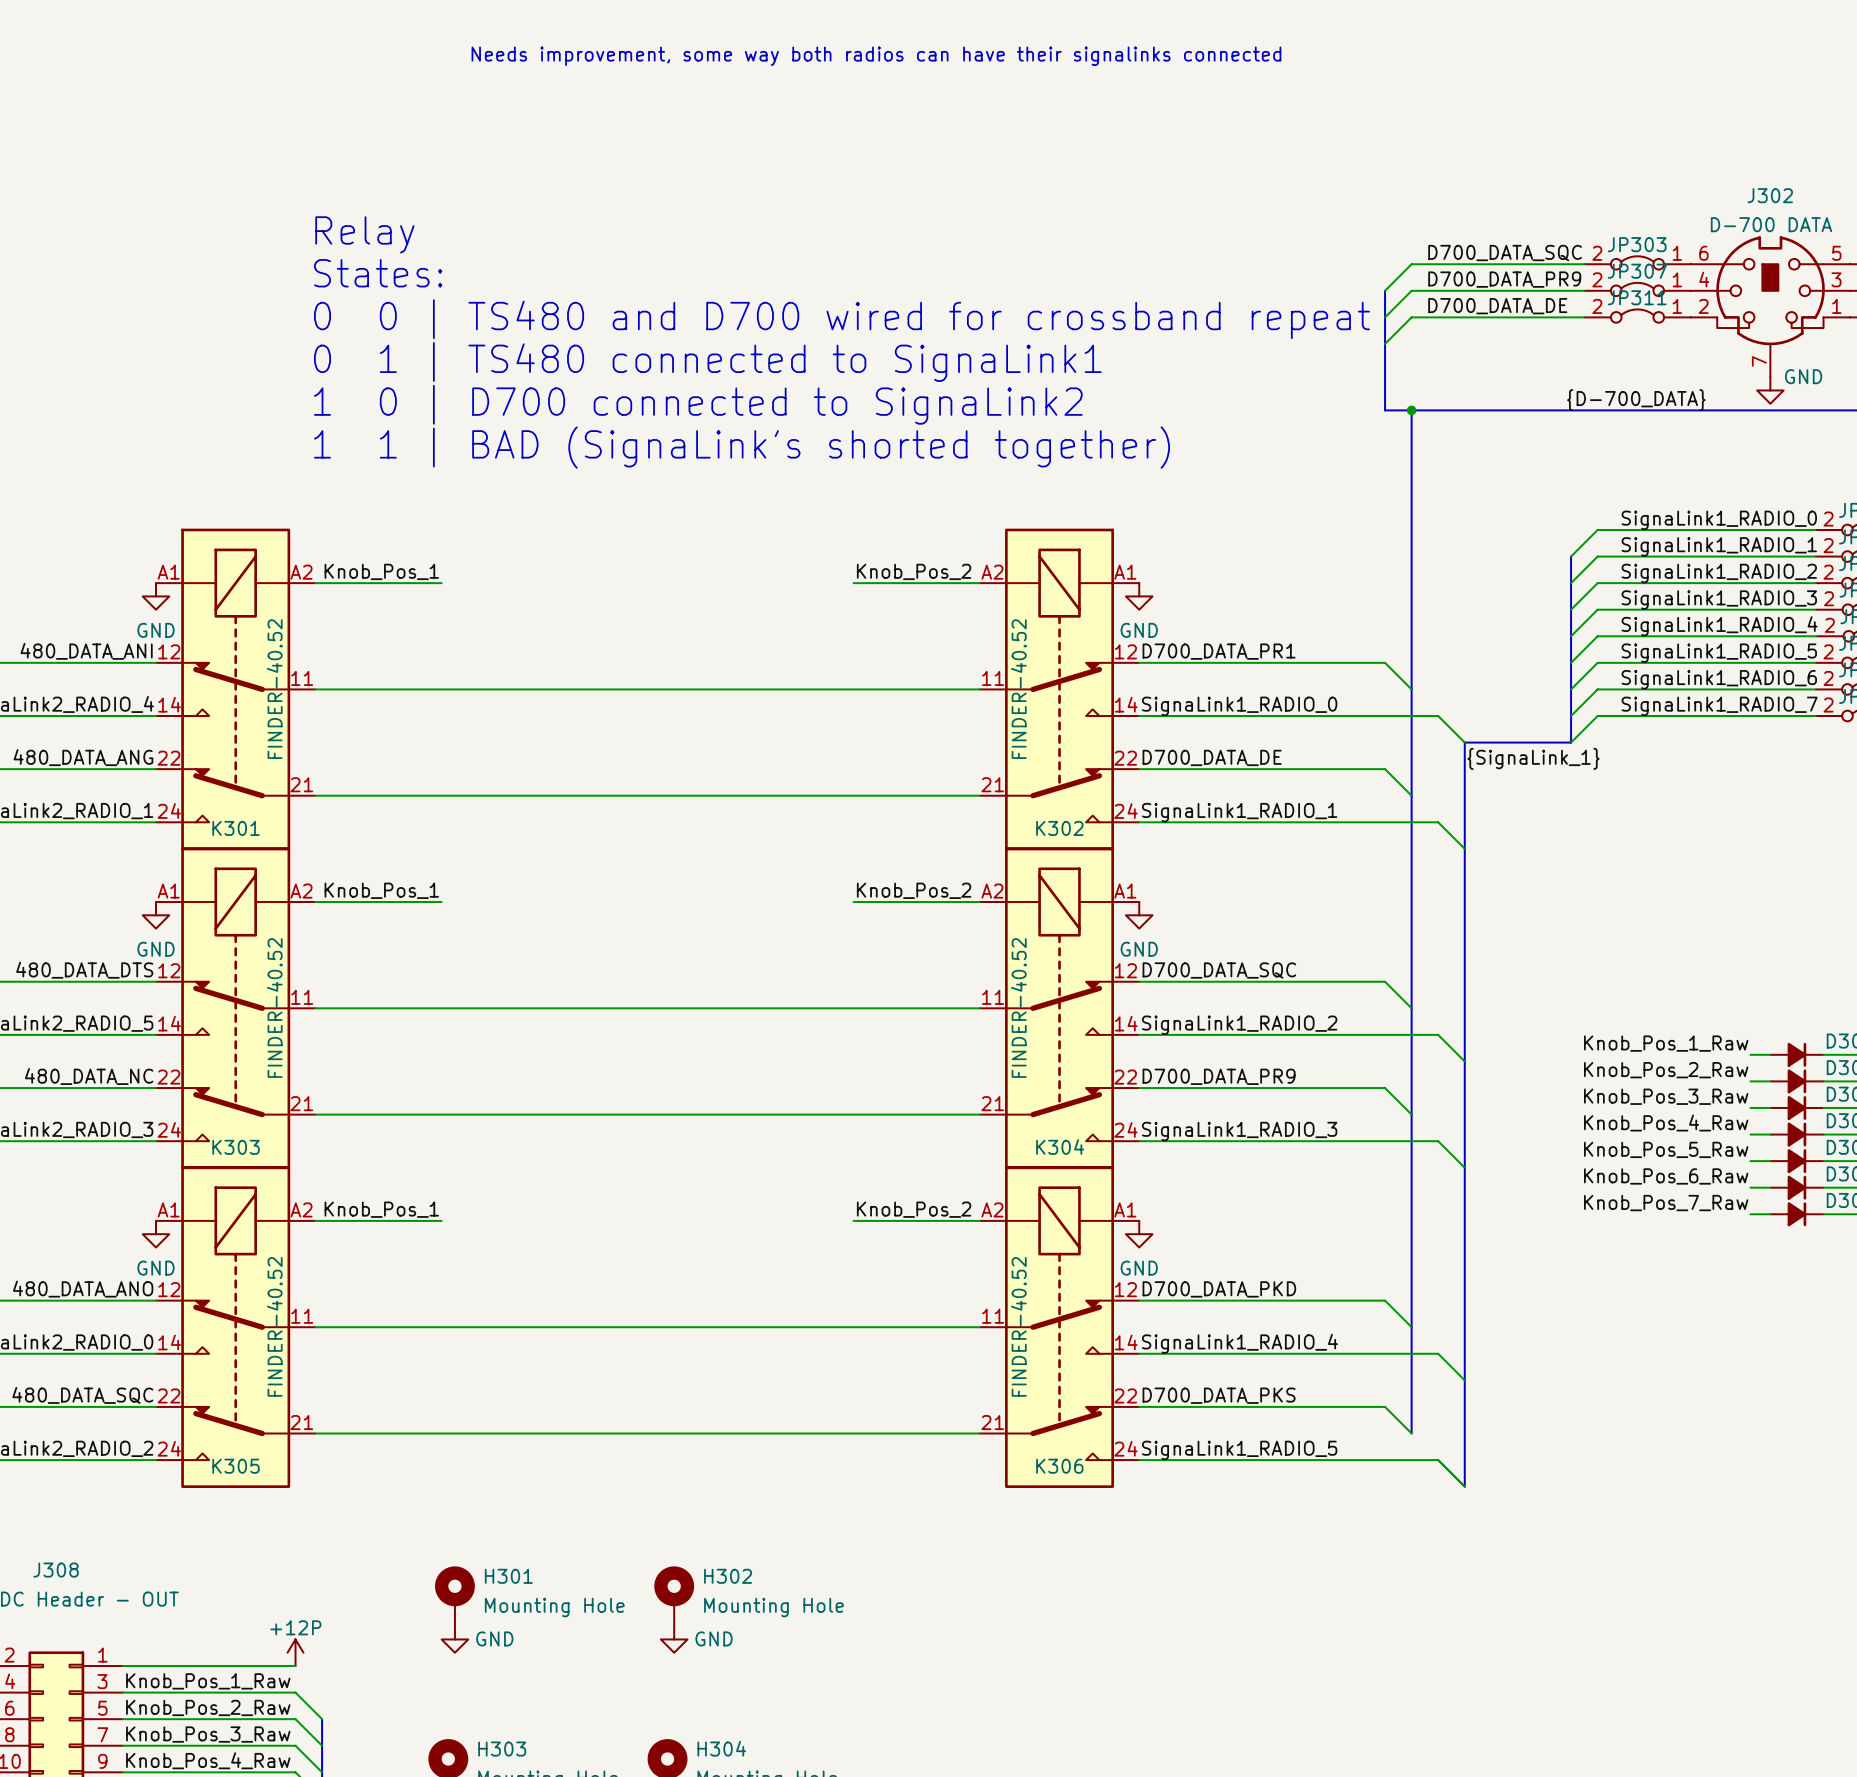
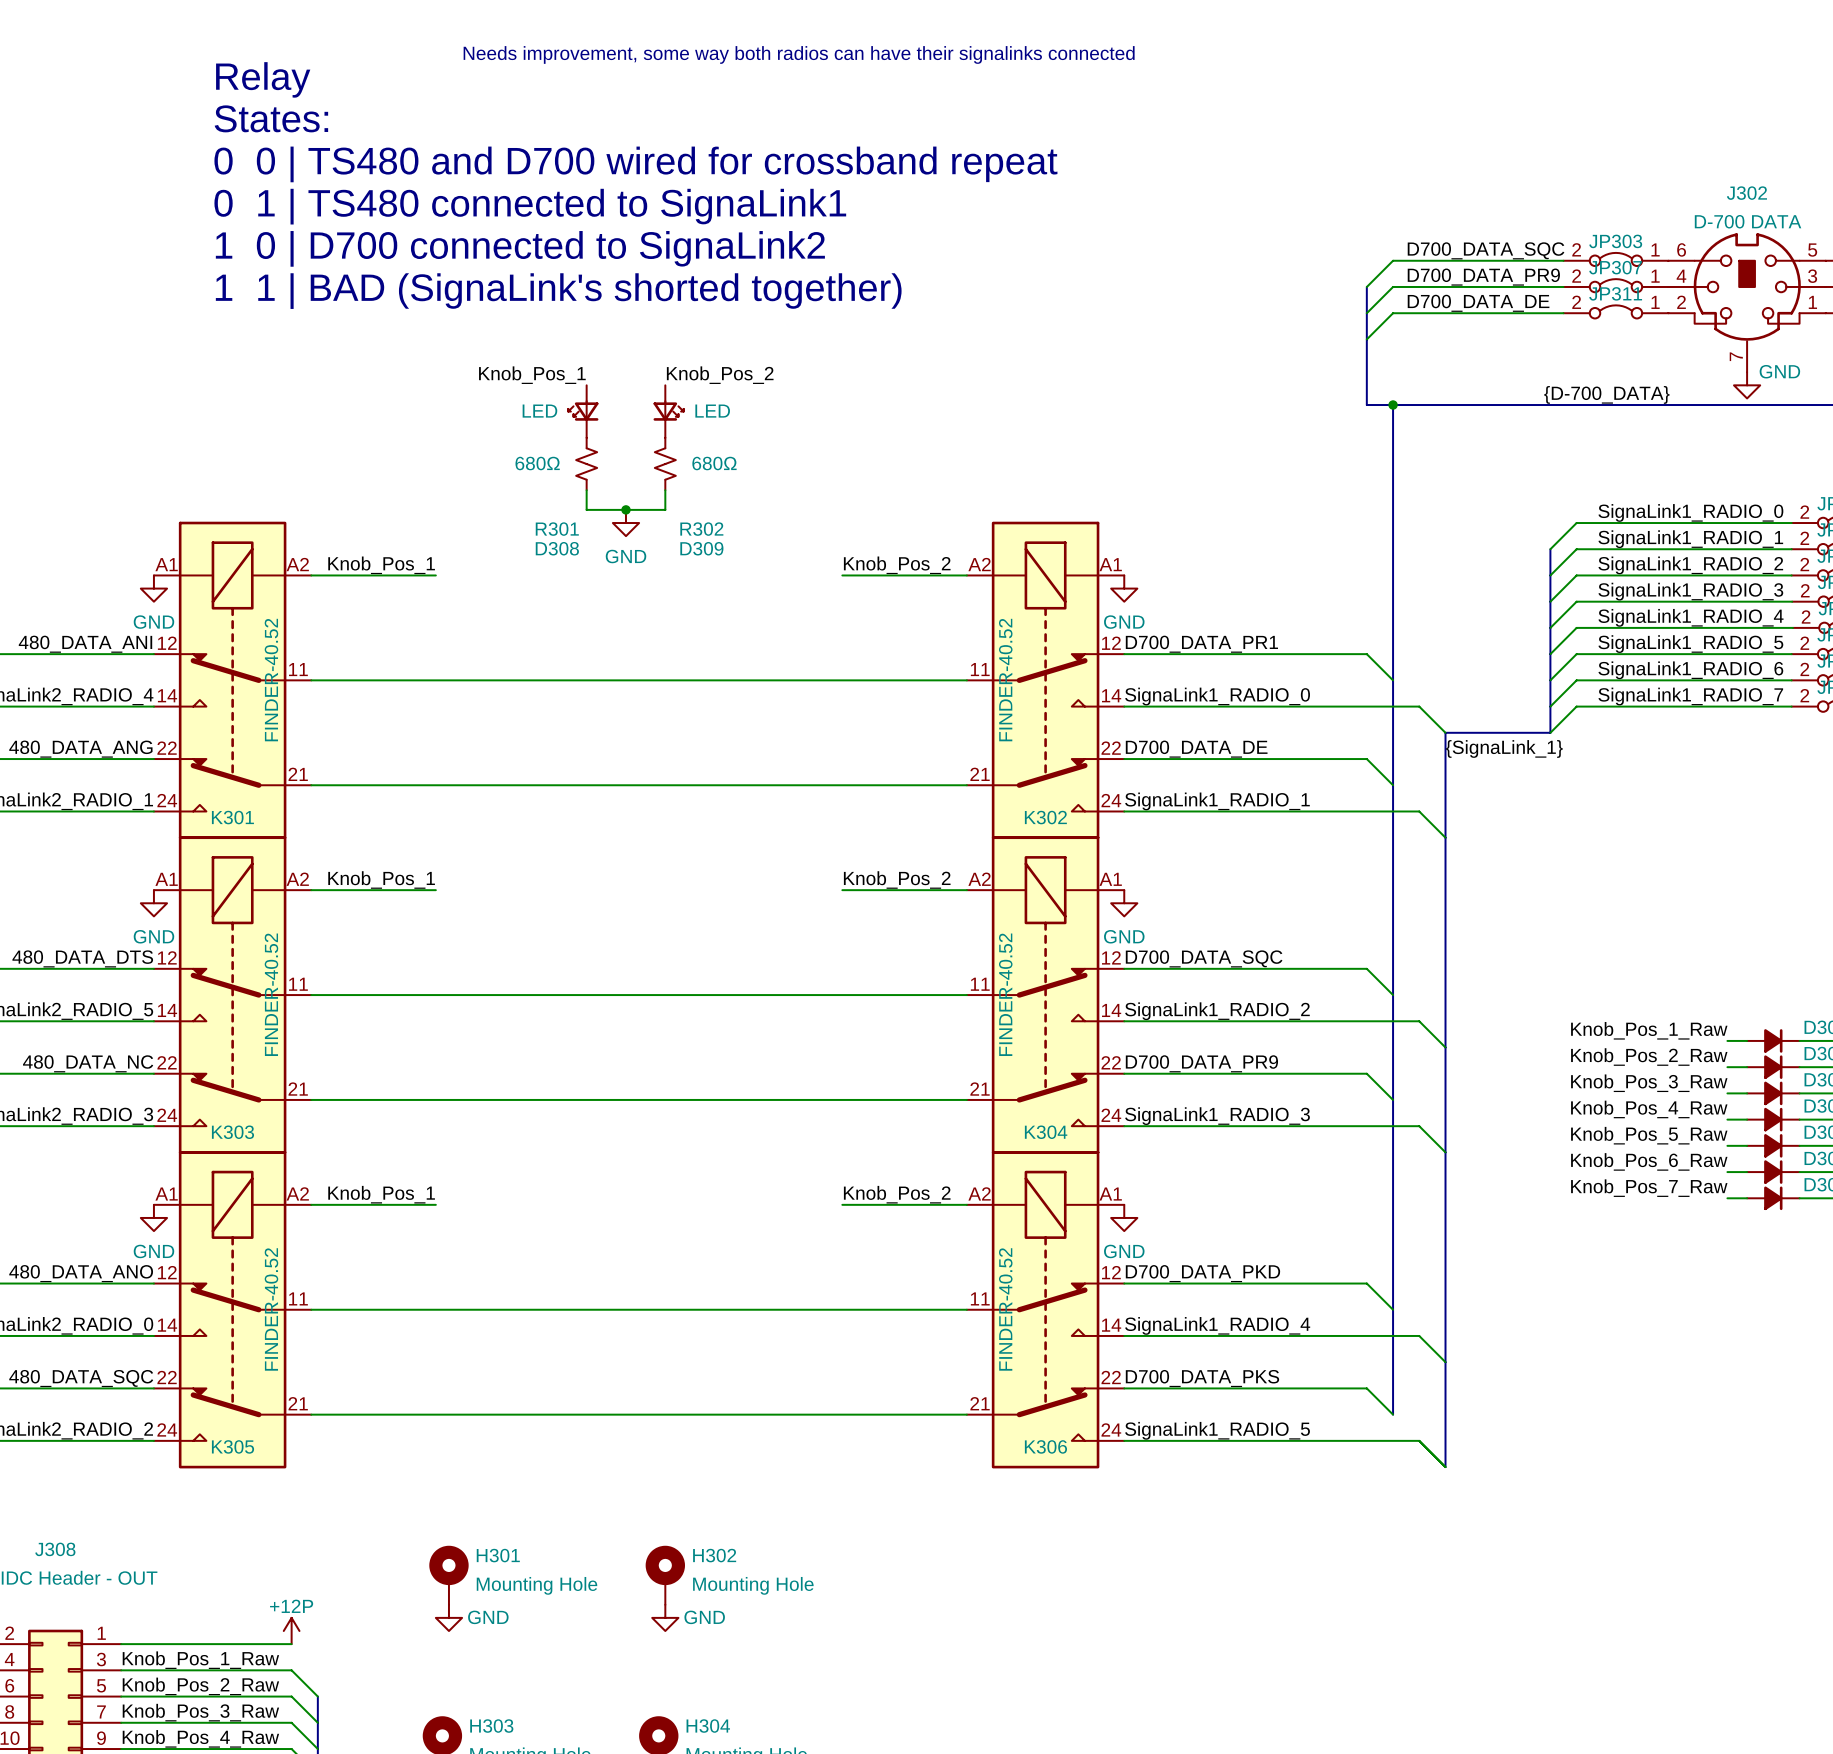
text position: Relay (364, 234) -> Relay (263, 79)
text position: States: (378, 273) -> States: (271, 118)
text position: 0 0 | TS480 and D700 wired for crossband repeat (841, 319) -> 0 0 | TS480 and D700 wired for crossband repeat (635, 164)
text position: 0 1 | TS480 connected to SignaLink1 (707, 361) -> 0 1 | TS480 connected to SignaLink1 (530, 206)
label: none -> Knob_Pos_1 (532, 375)
label: none -> Knob_Pos_2 (720, 375)
text position: 1 0 | D700 connected to SignaLink2 (698, 404) -> 1 0 | D700 connected to SignaLink2 (520, 248)
D308: none -> LED (583, 411)
D309: none -> LED (668, 411)
text position: 1 1 | BAD (SignaLink's shorted together) (741, 447) -> 1 1 | BAD (SignaLink's shorted together) (558, 291)
R301: none -> 680Ω (586, 464)
R302: none -> 680Ω (665, 464)
wire: none -> (586, 490) (586, 509) (665, 509) (665, 490)
junction: none -> (625, 509)
power symbol: none -> GND (625, 523)

